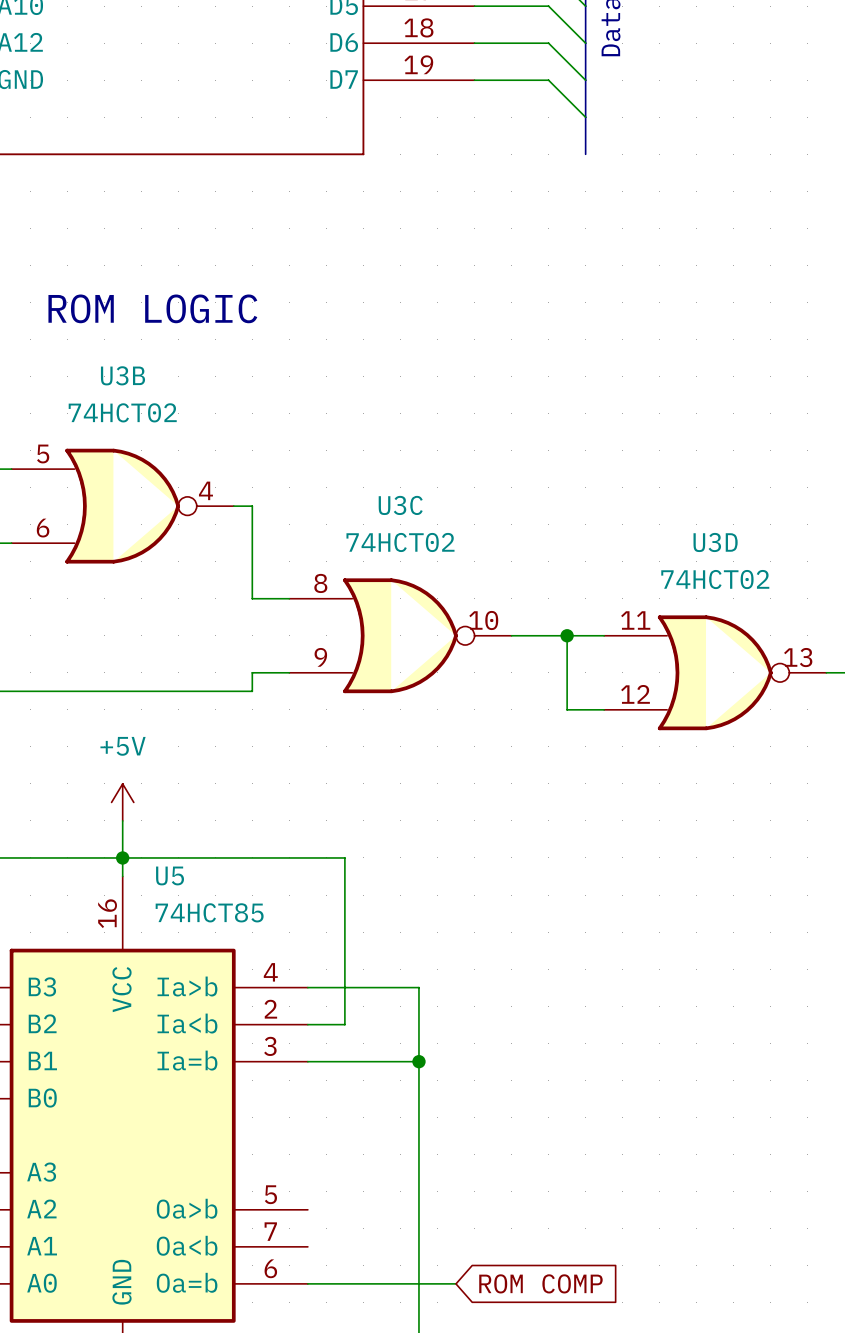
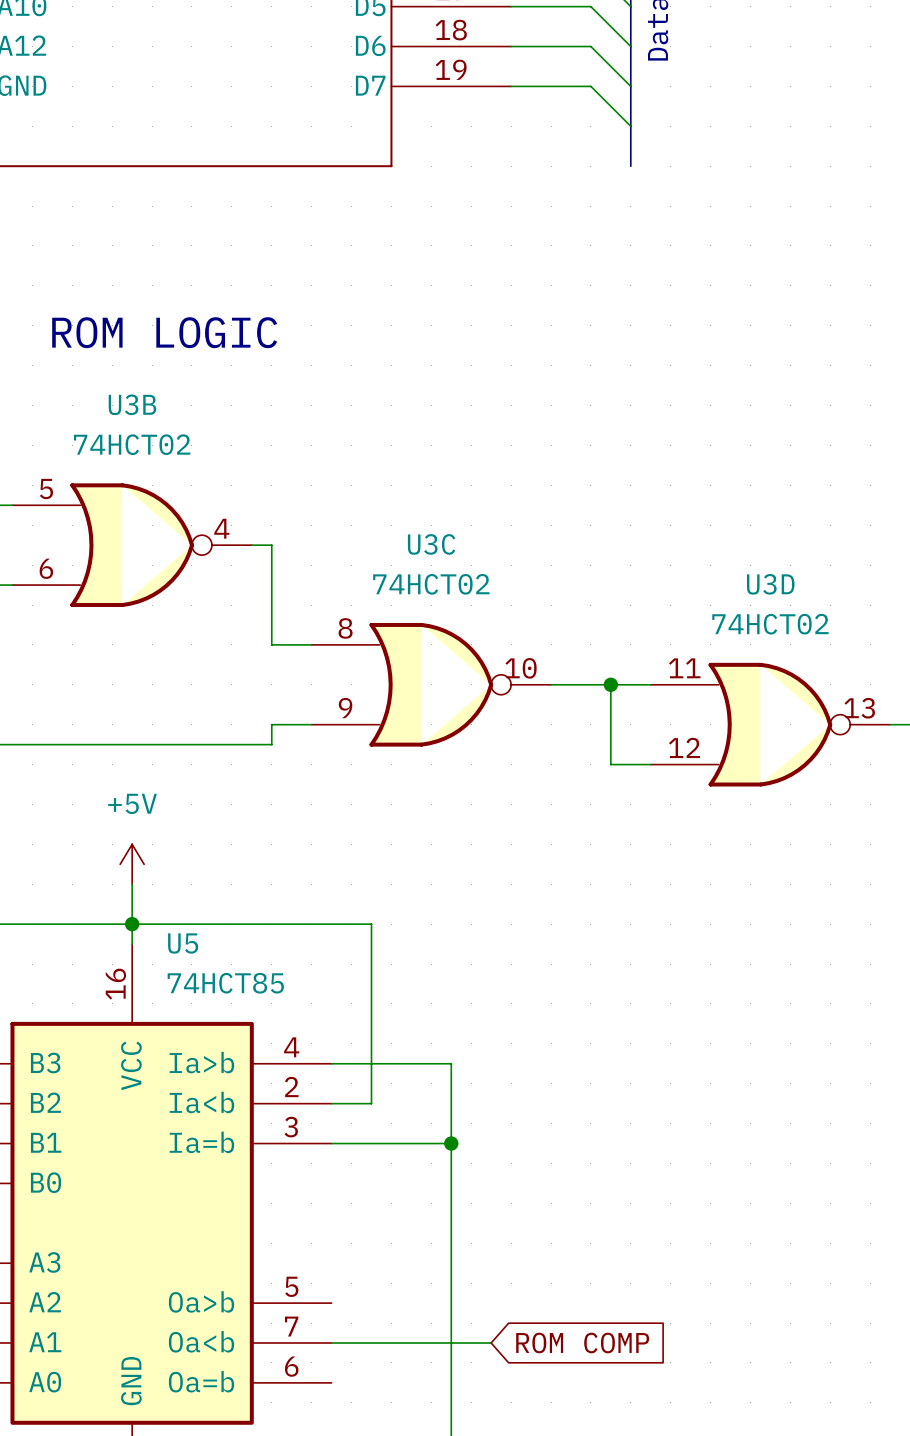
wire: (307, 1283) (456, 1283) -> (331, 1343) (491, 1343)
global label position: ROM COMP (540, 1283) -> ROM COMP (582, 1343)

